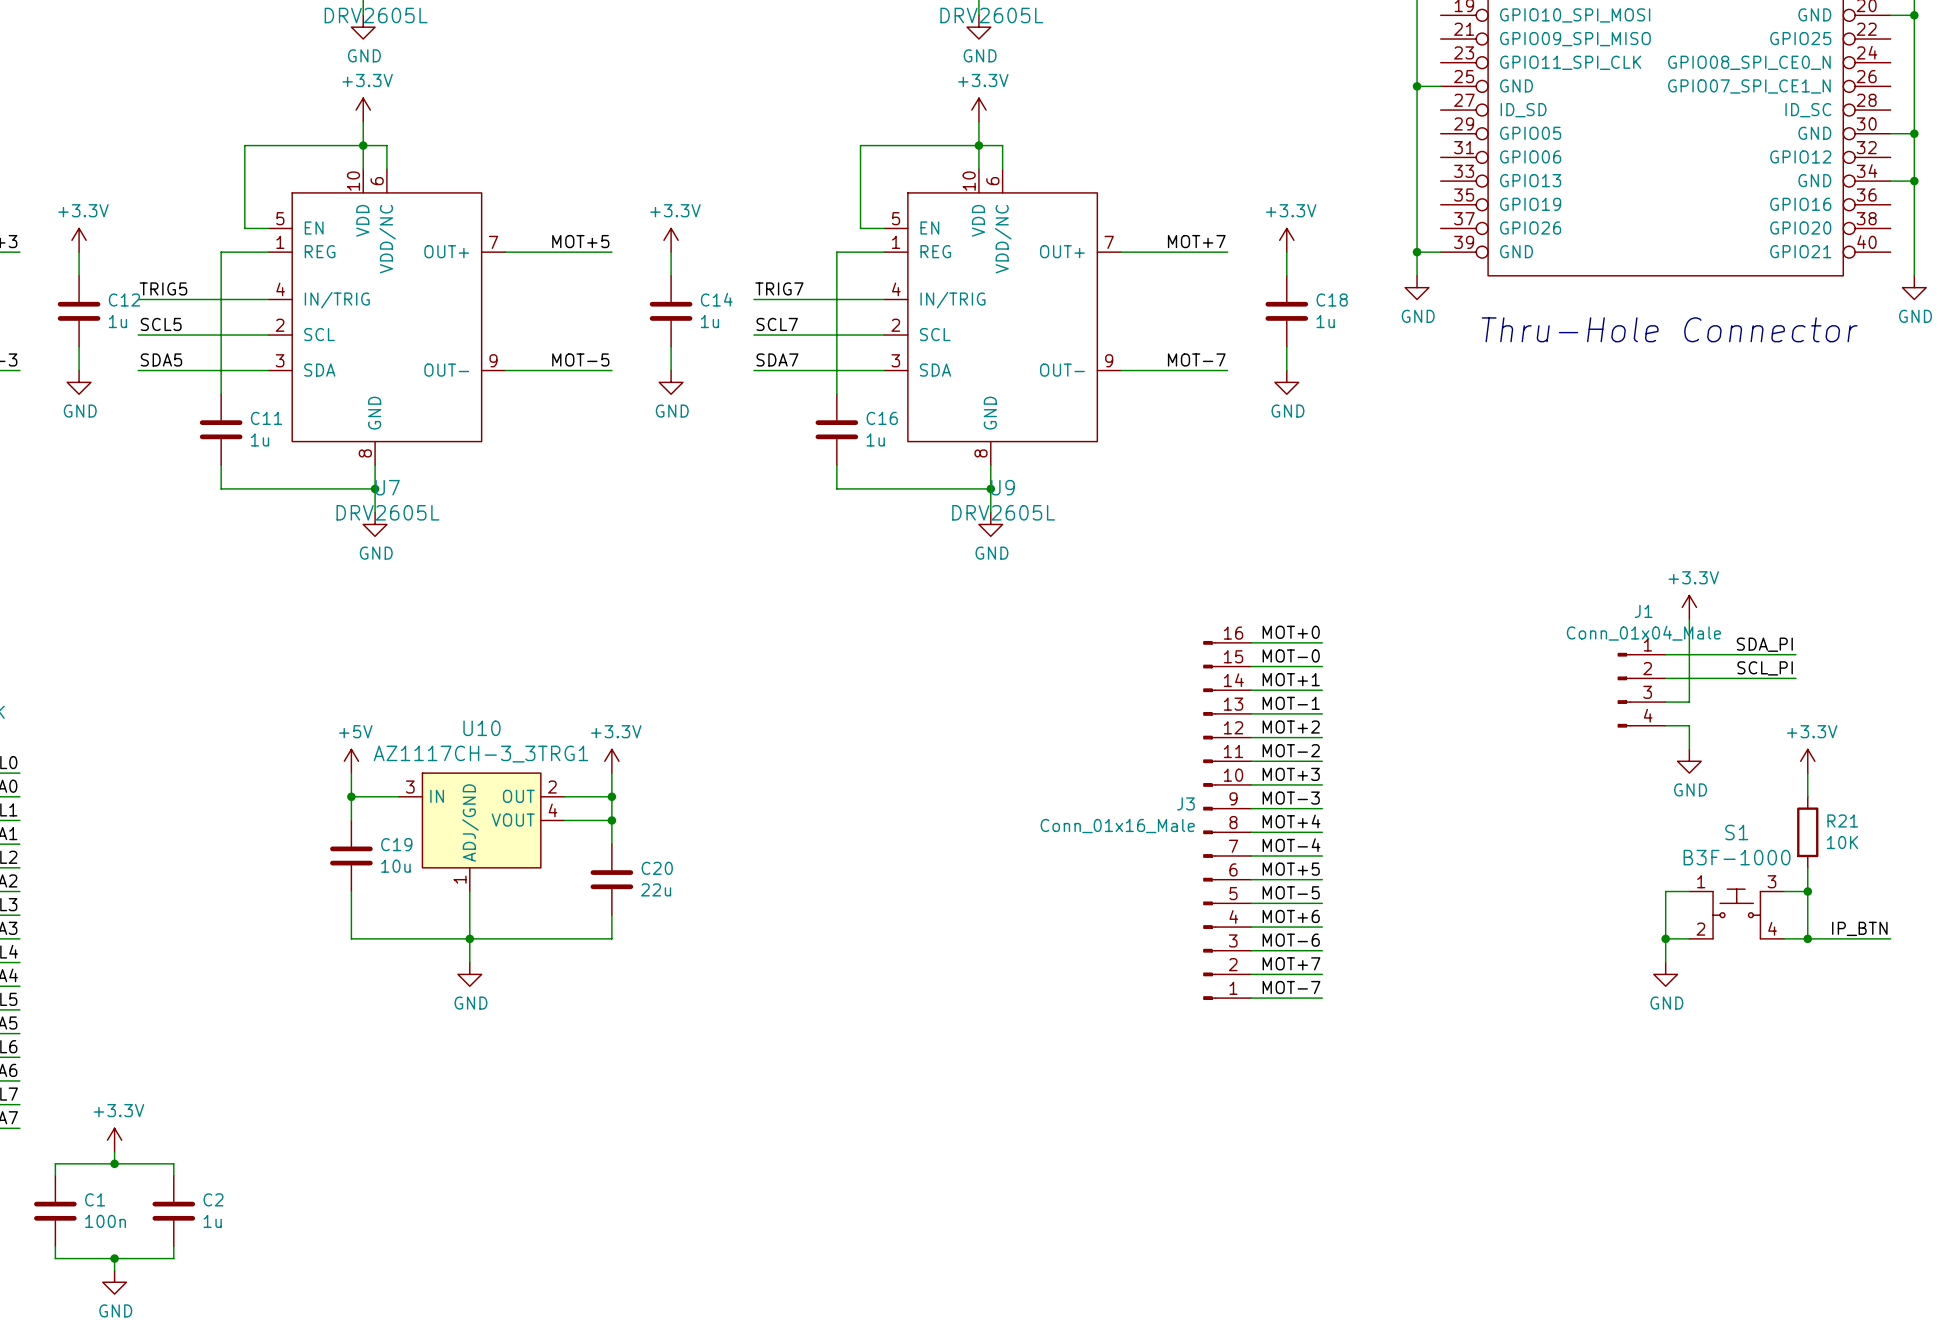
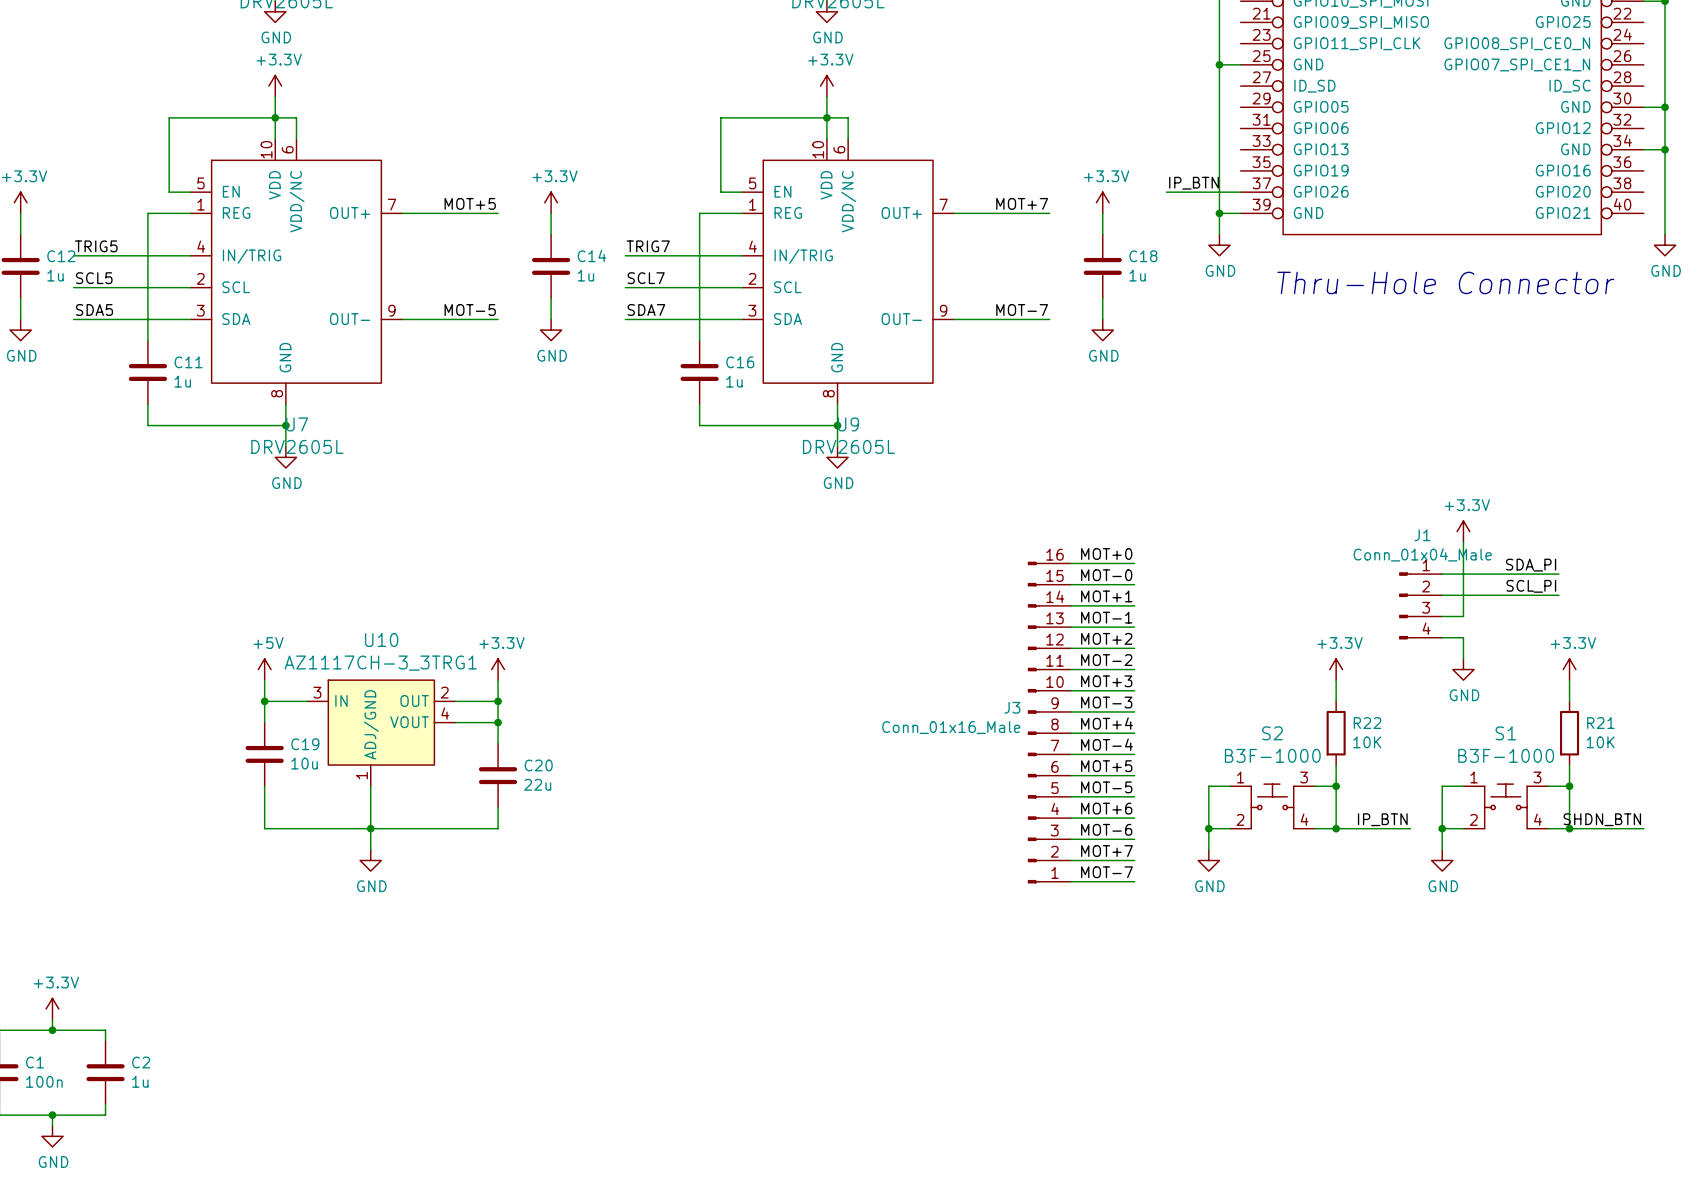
label: none -> IP_BTN (1194, 183)
wire: none -> (1166, 192) (1240, 192)
power symbol: none -> +3.3V (1336, 669)
wire: none -> (1336, 680) (1336, 701)
R22: none -> 10K (1336, 733)
wire: none -> (1336, 765) (1336, 828)
wire: none -> (1230, 786) (1208, 786) (1208, 849)
wire: none -> (1314, 786) (1336, 786)
junction: none -> (1336, 786)
S2: none -> B3F-1000 (1272, 806)
label: none -> IP_BTN (1382, 819)
label: IP_BTN (1859, 928) -> SHDN_BTN (1602, 819)
wire: none -> (1208, 828) (1230, 828)
junction: none -> (1208, 828)
wire: none -> (1314, 828) (1410, 828)
junction: none -> (1336, 828)
power symbol: none -> GND (1208, 860)

